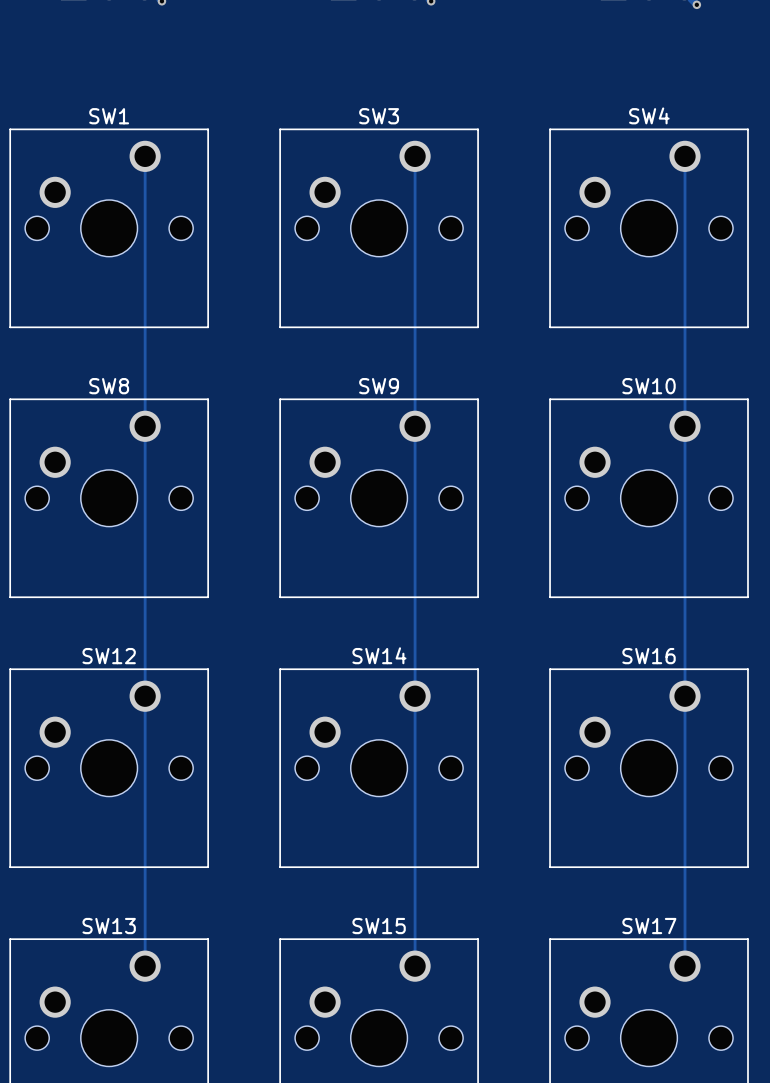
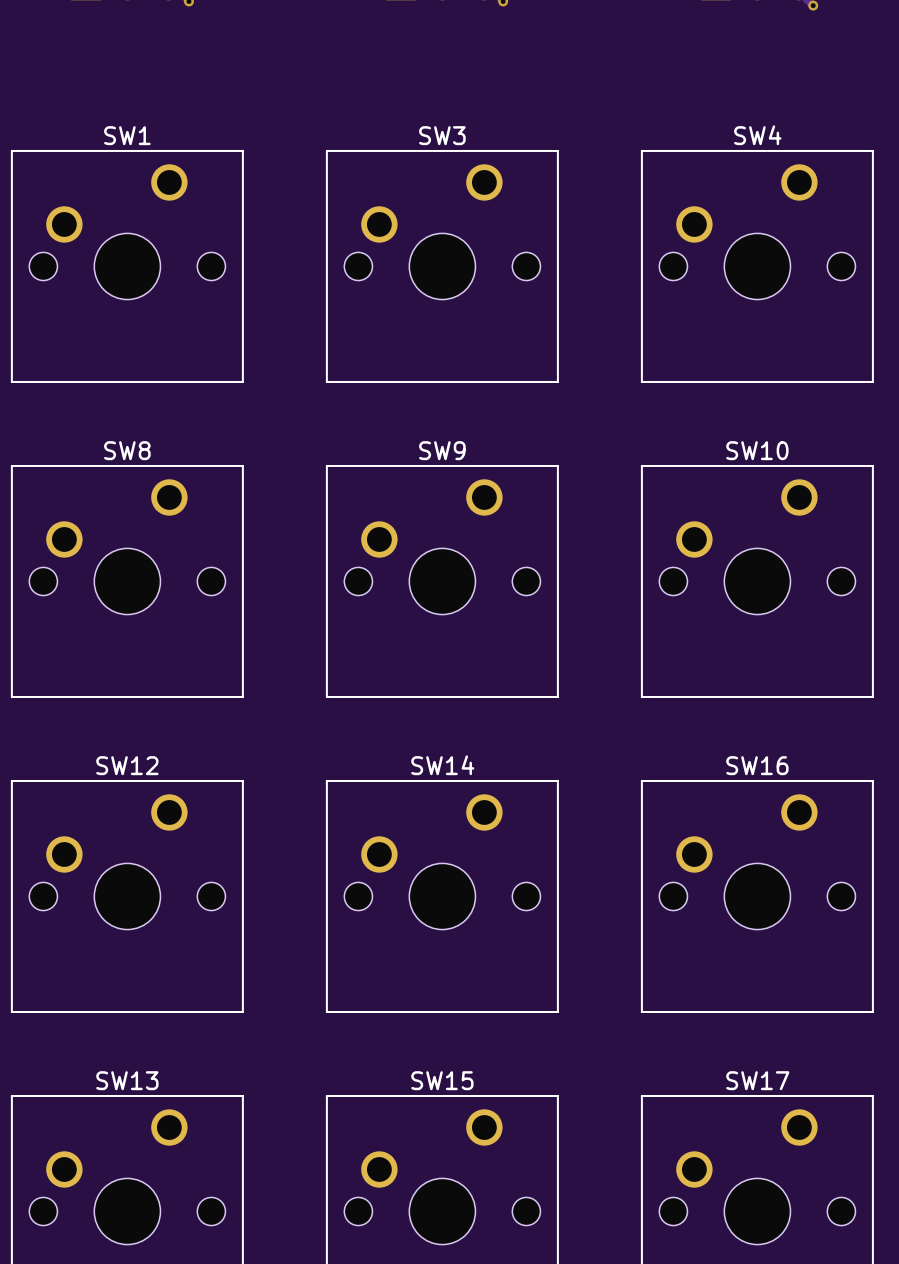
track: (145, 156) (145, 966) -> none
track: (415, 156) (415, 966) -> none
track: (685, 156) (685, 966) -> none

